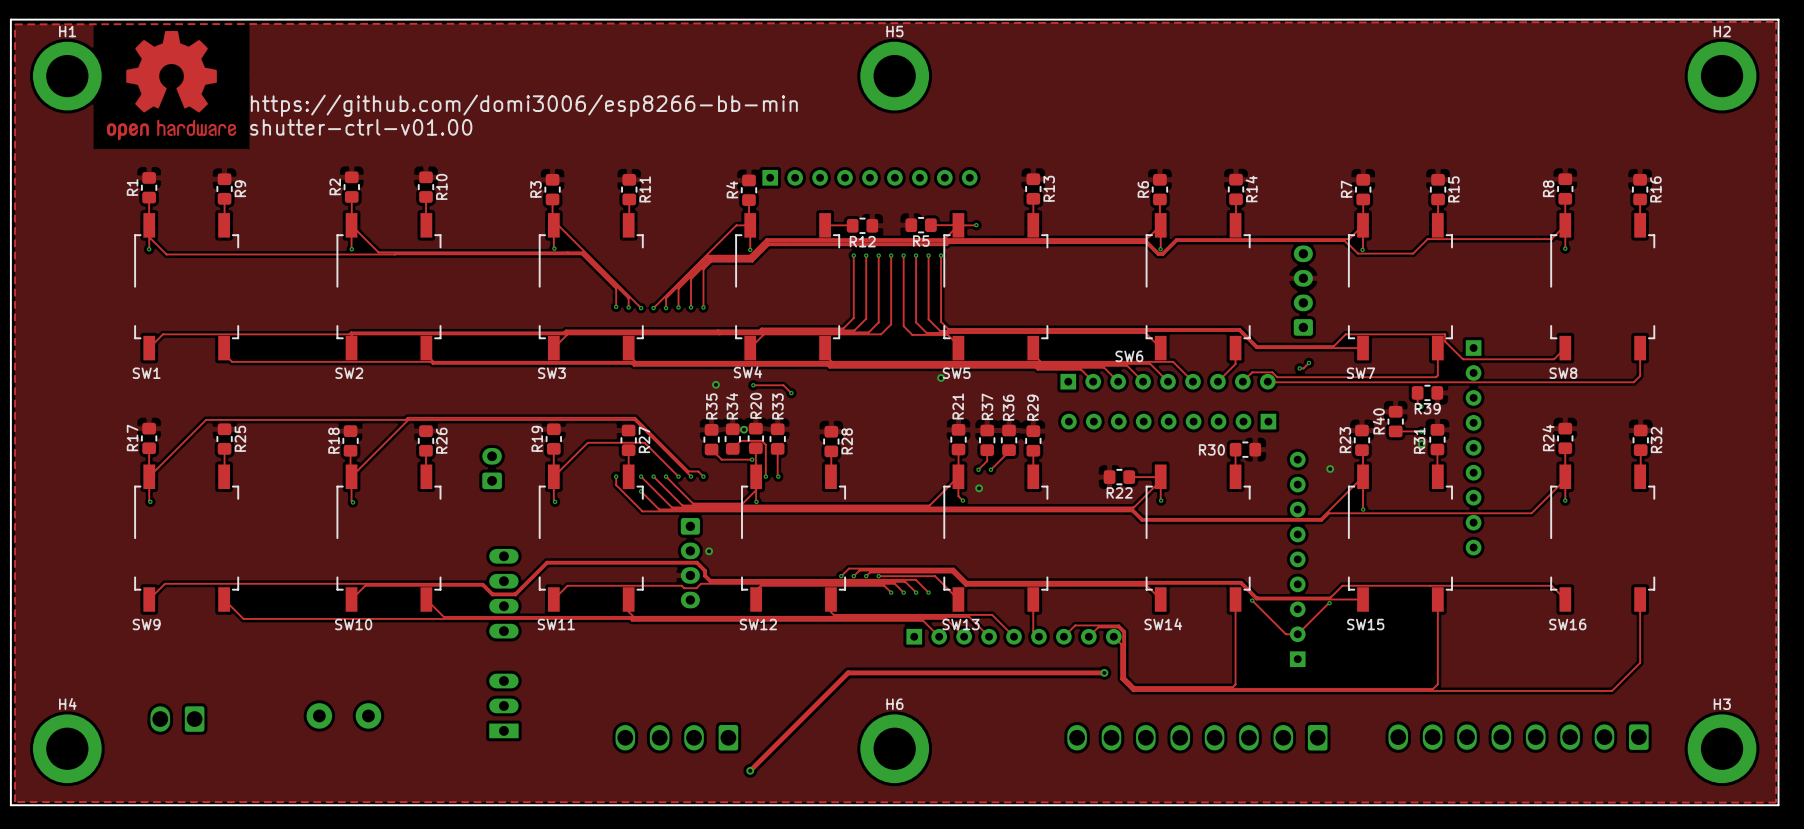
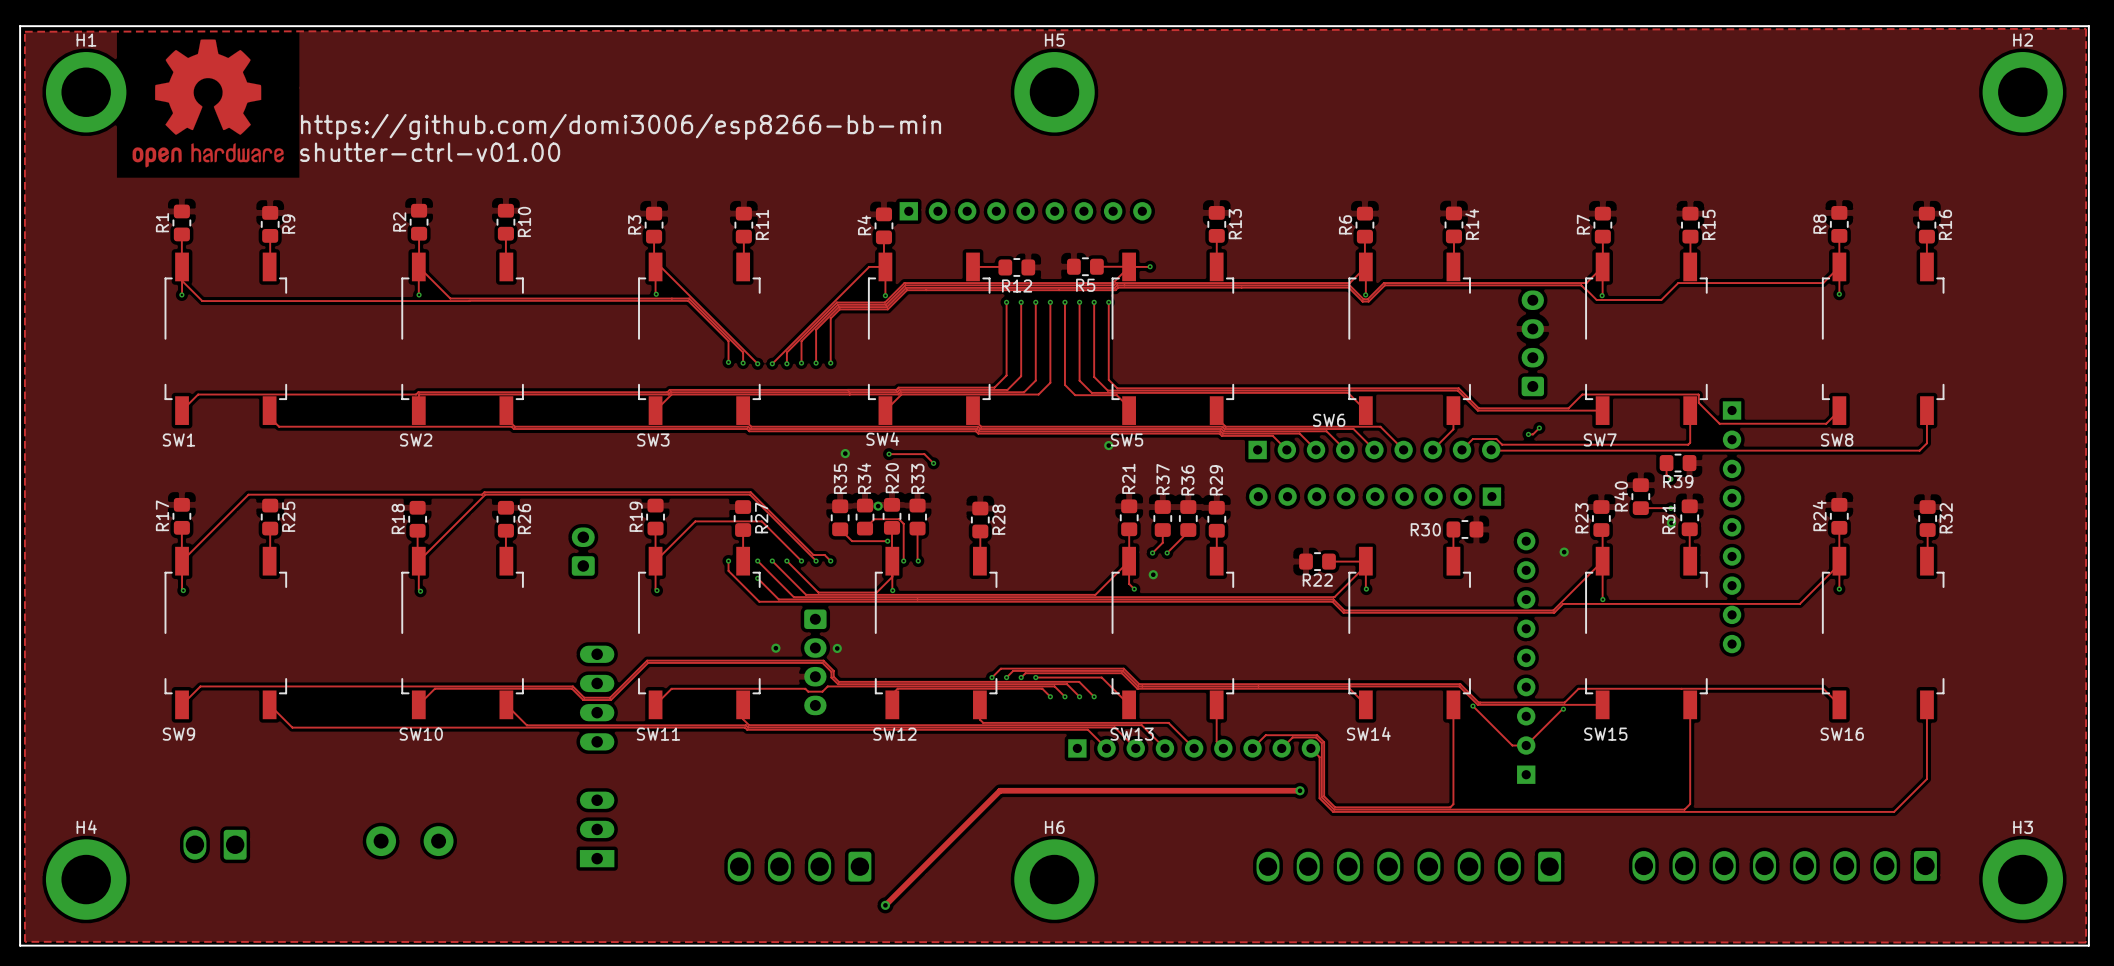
via: none -> (775, 648)

